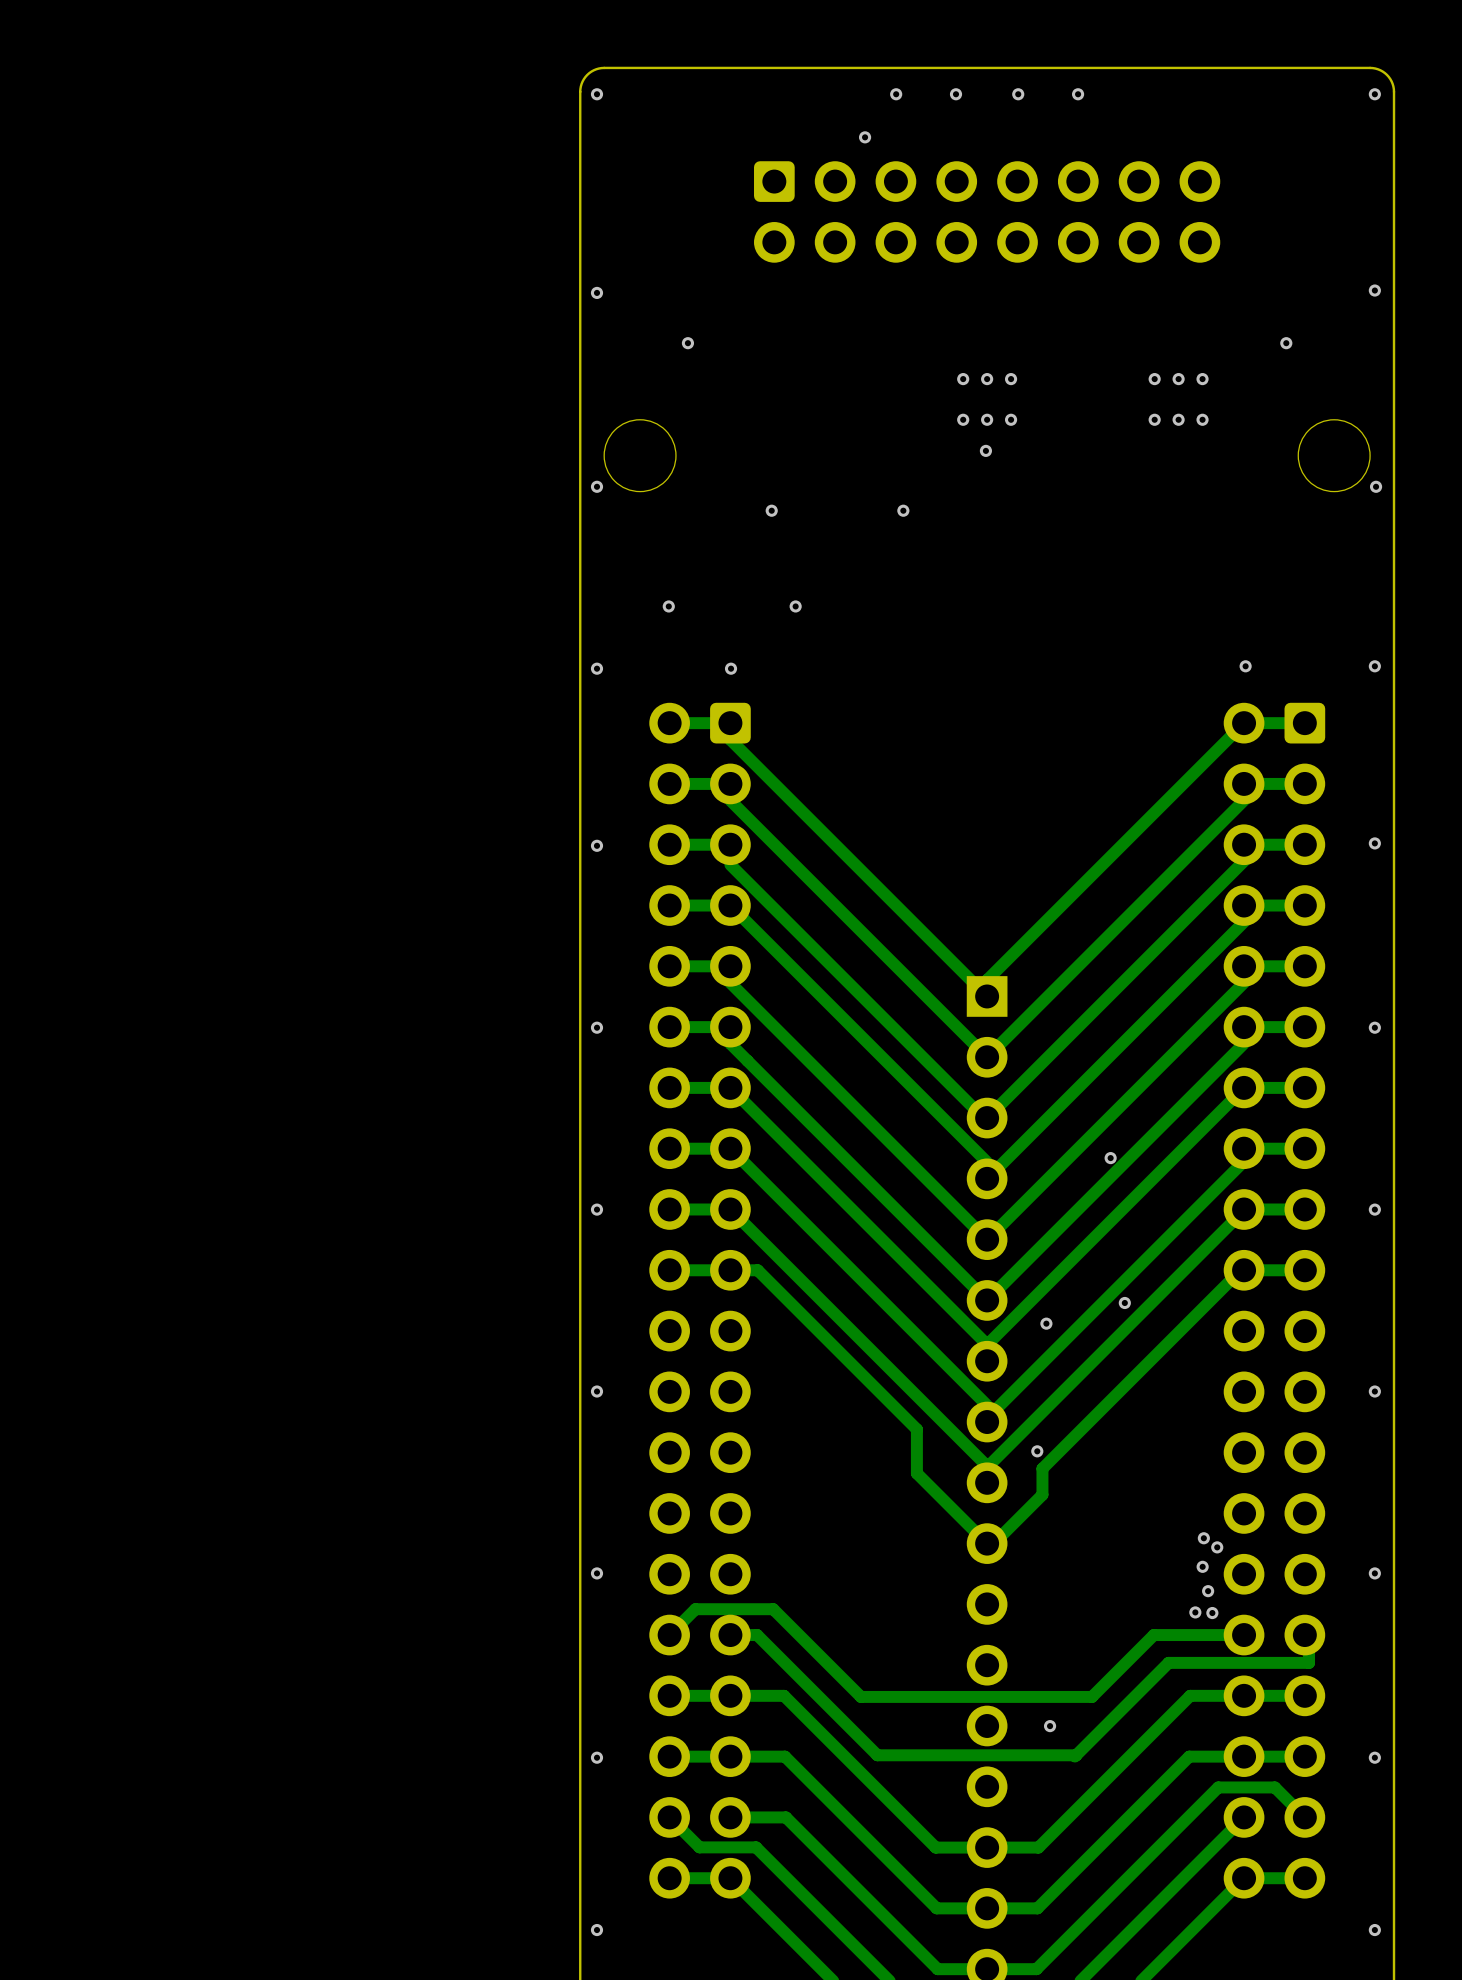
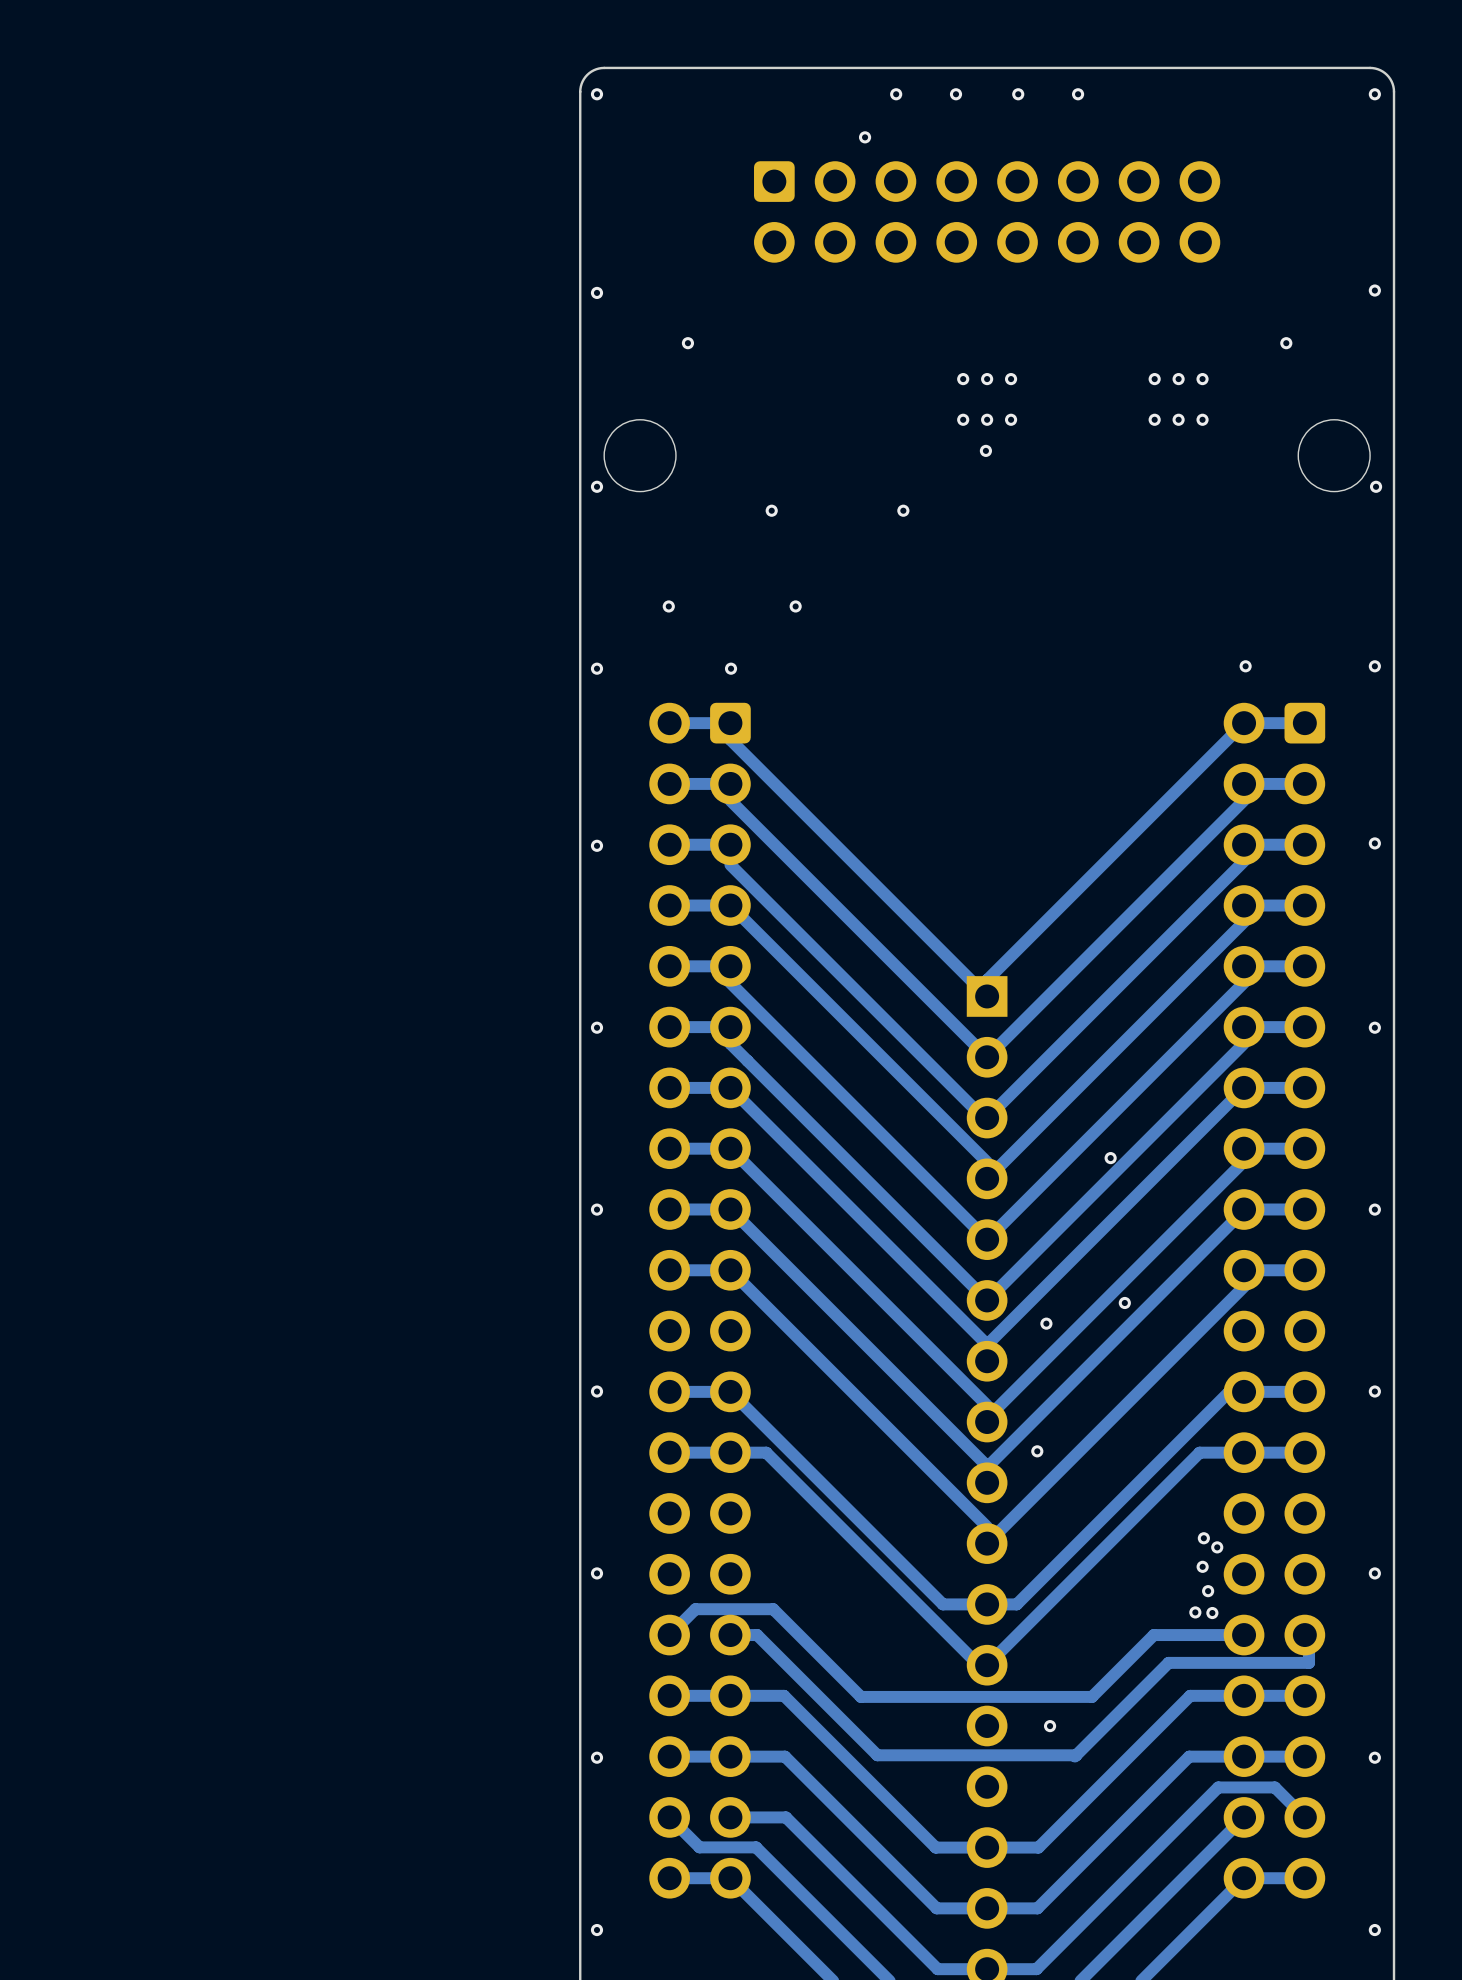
track: (1260, 1270) (1240, 1270) (1042, 1468) (1042, 1494) (993, 1543) (987, 1543) (916, 1473) (916, 1429) (757, 1270) (730, 1270) -> (987, 1526) (730, 1270)
track: none -> (1260, 1270) (987, 1543)
track: none -> (1304, 1391) (1229, 1391) (1016, 1604) (942, 1604) (730, 1391) (669, 1391)
track: none -> (1304, 1452) (1199, 1452) (987, 1665) (978, 1665) (766, 1452) (669, 1452)

